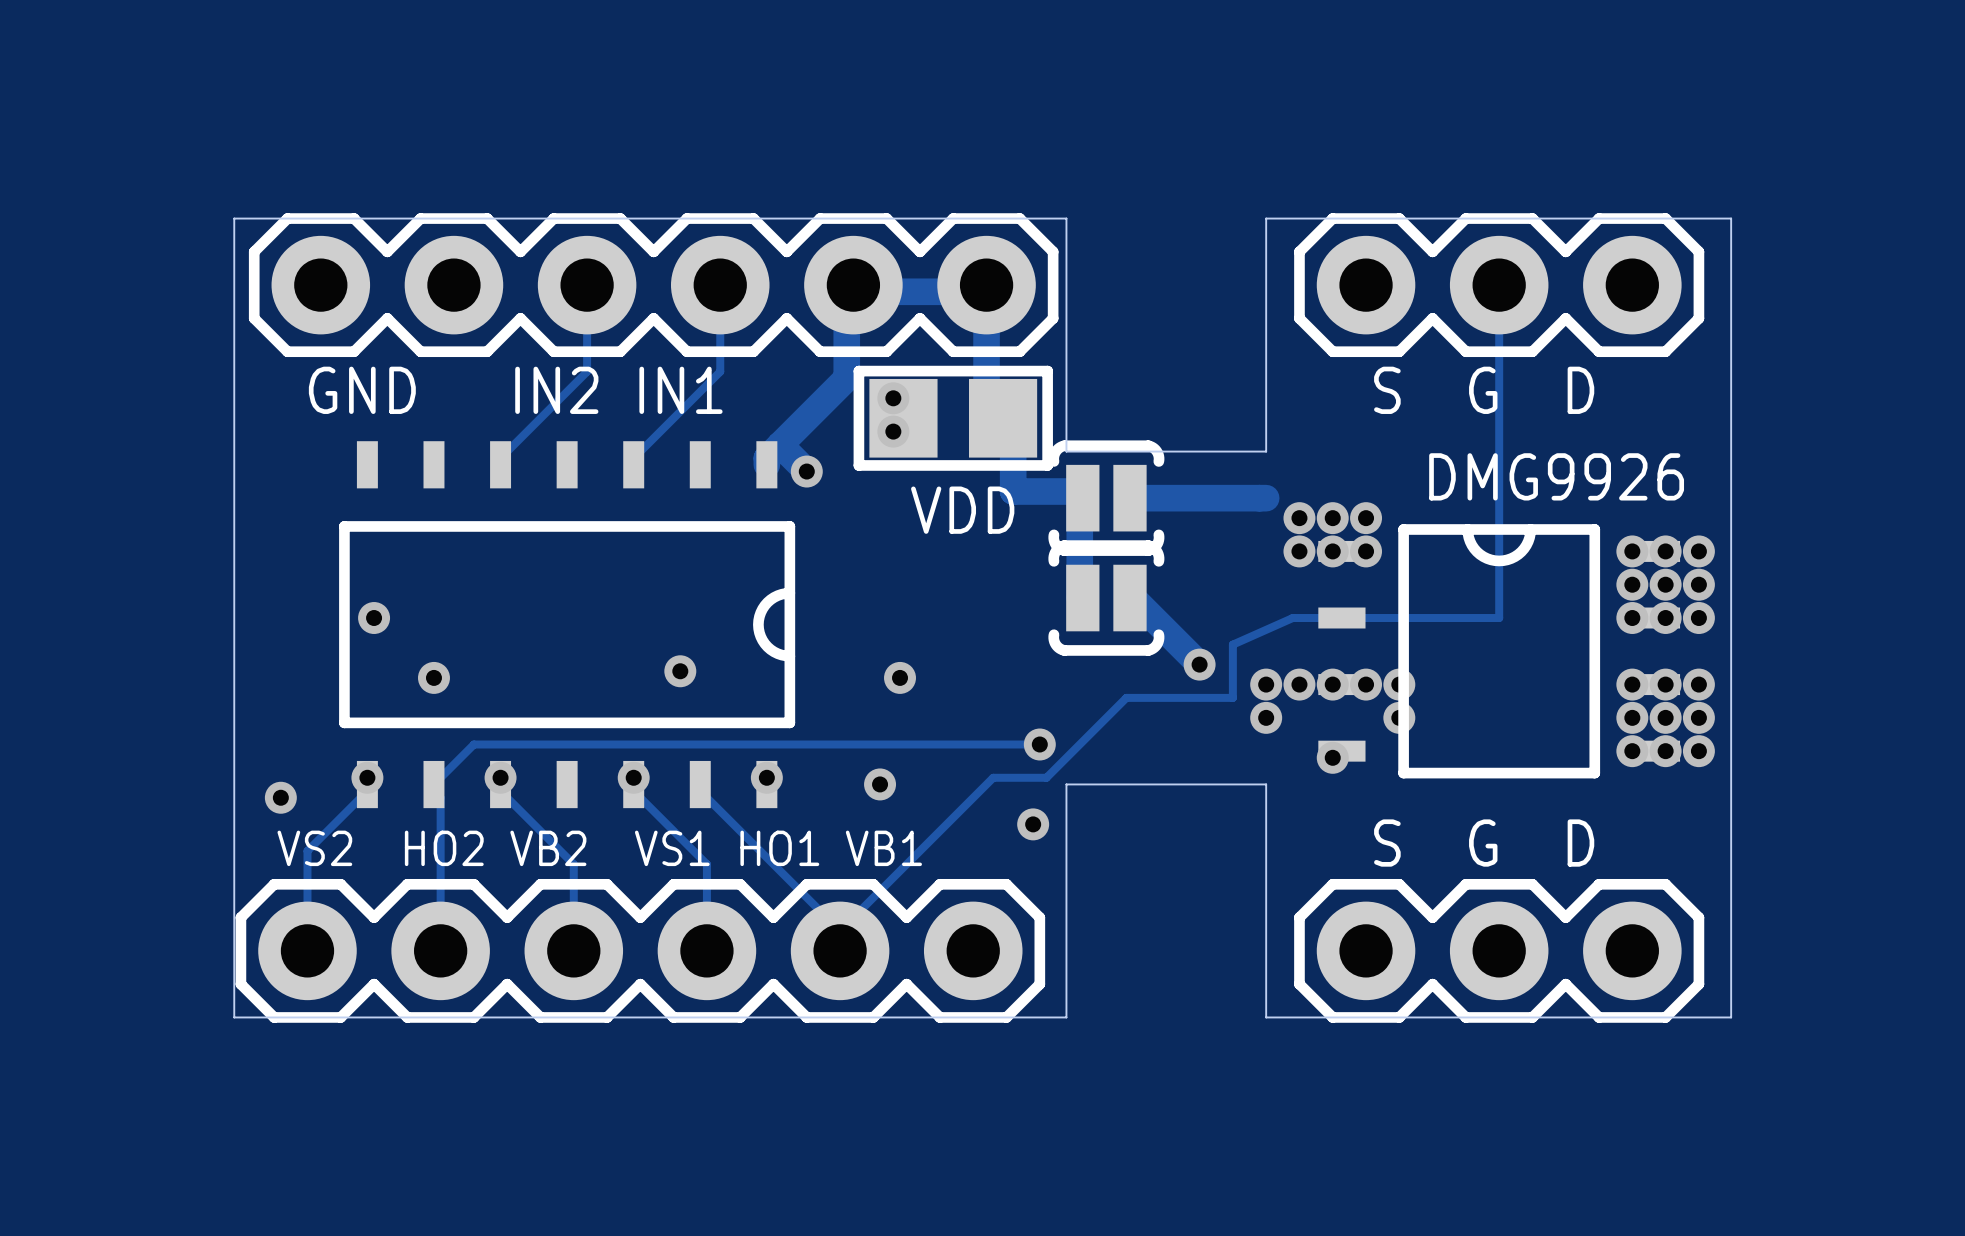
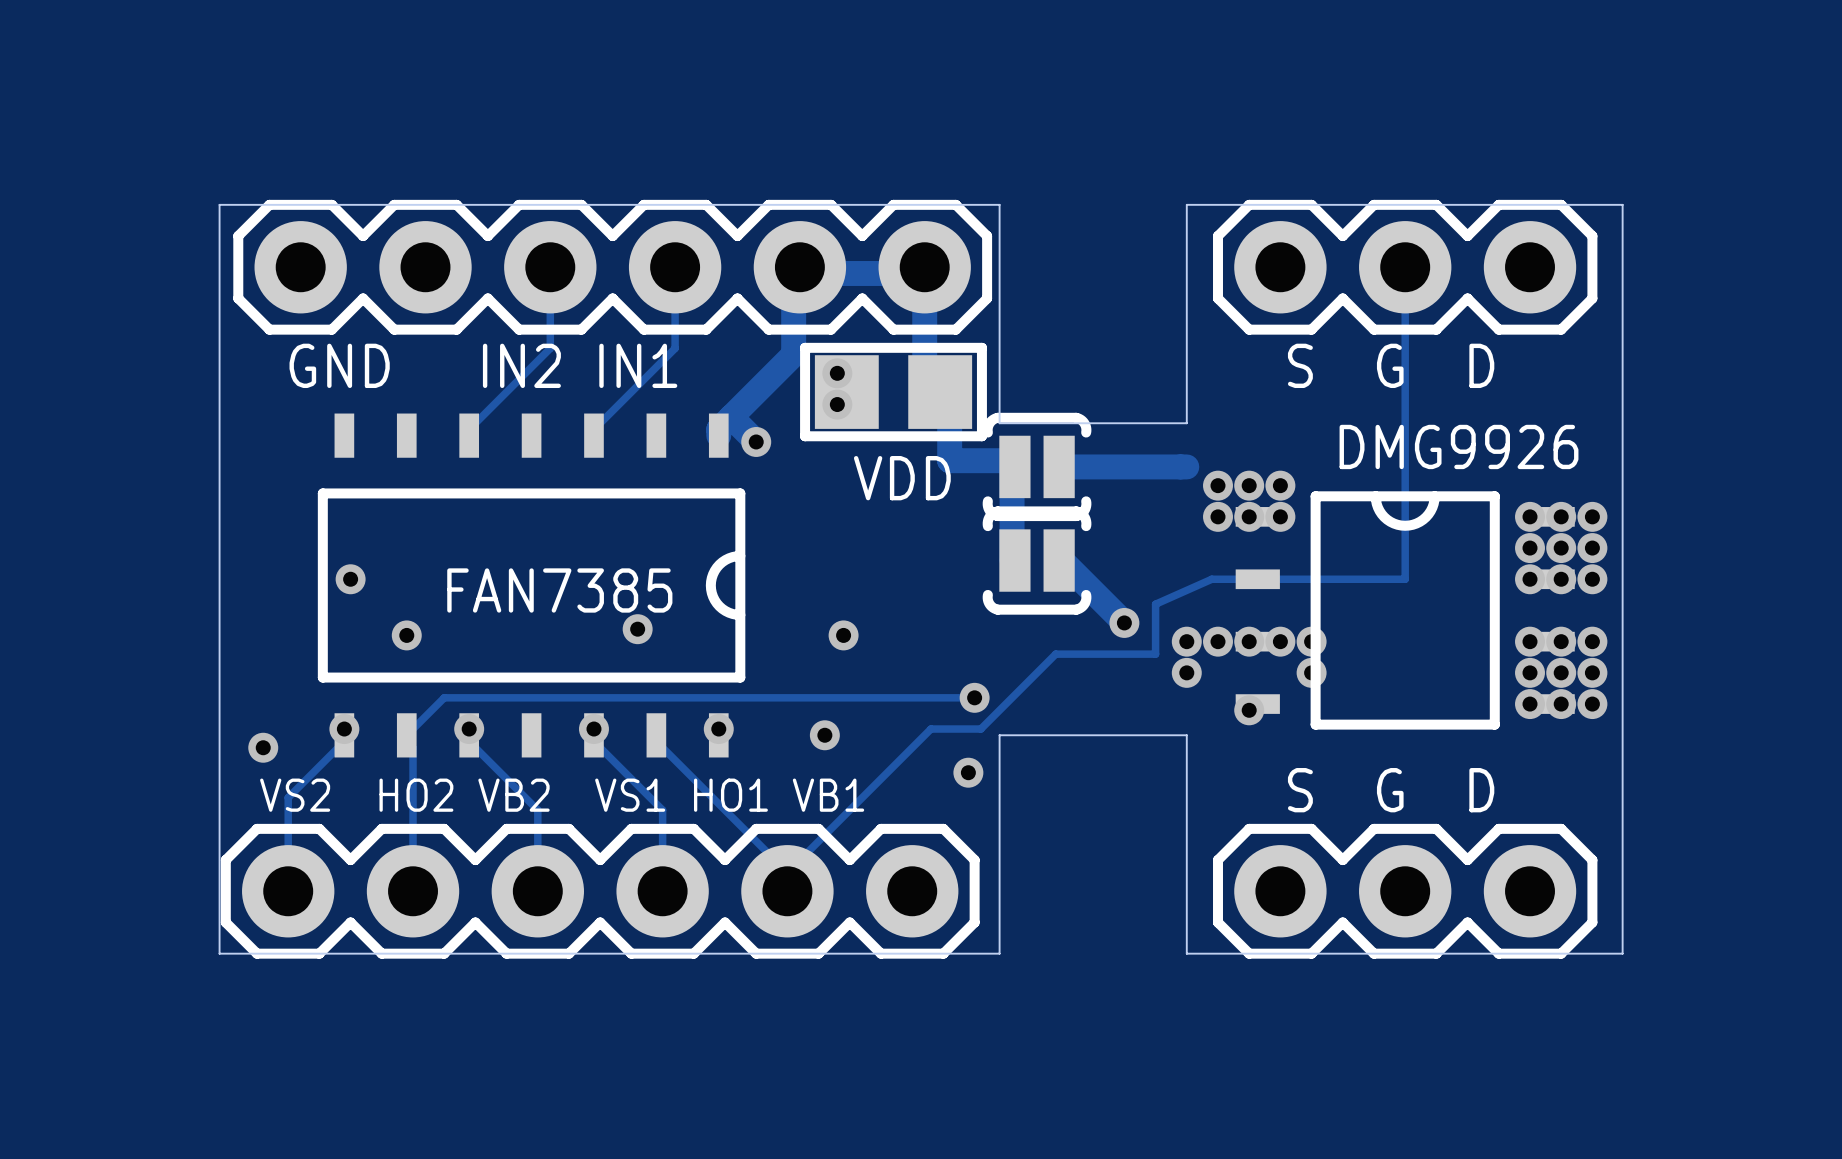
text: none -> FAN7385 (559, 590)

